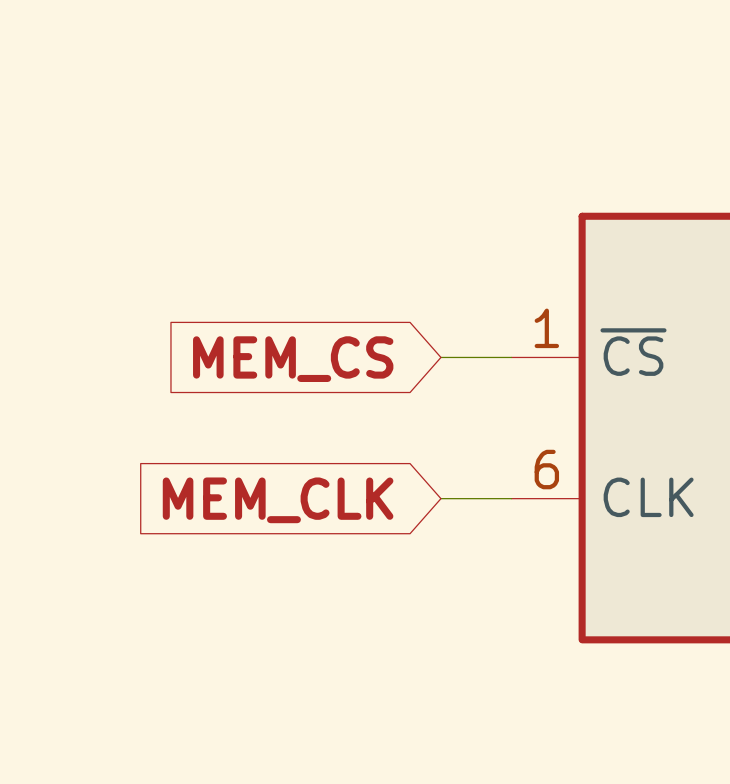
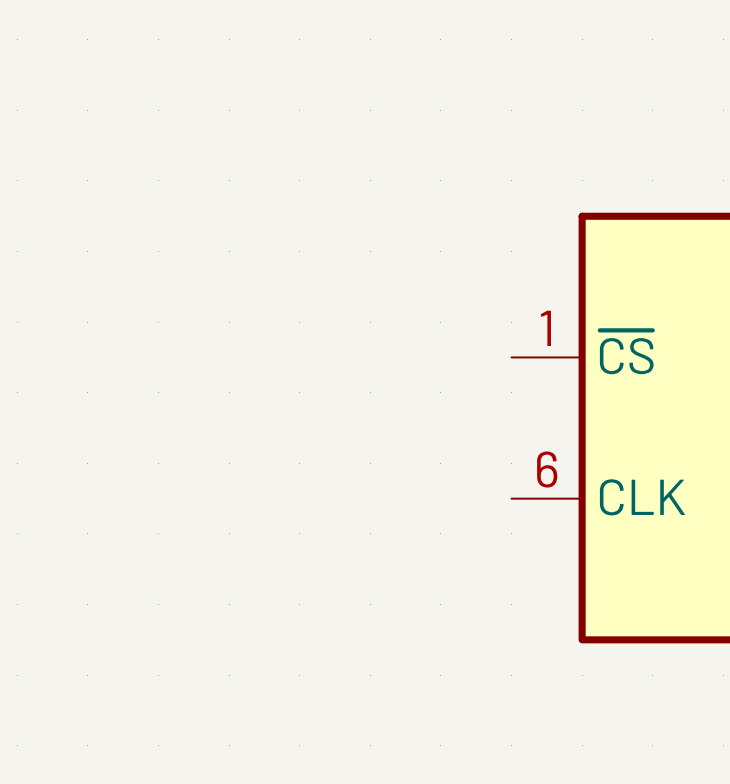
wire: (440, 357) (511, 357) -> none
global label: MEM_CS (293, 359) -> none
wire: (440, 498) (511, 498) -> none
global label: MEM_CLK (278, 500) -> none

